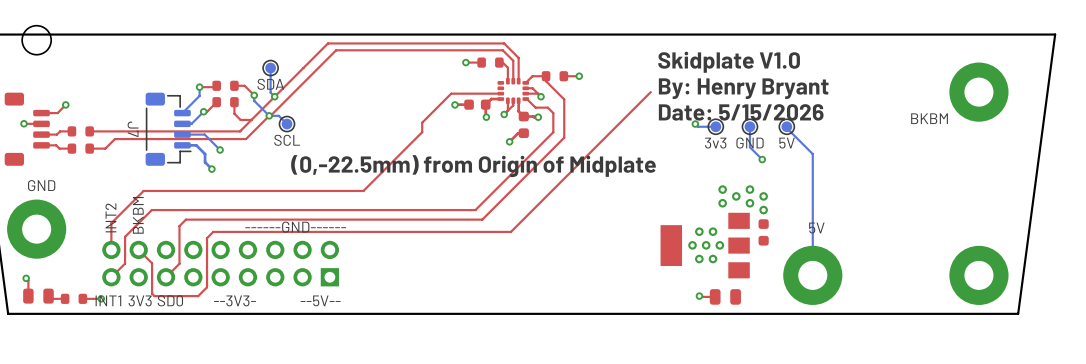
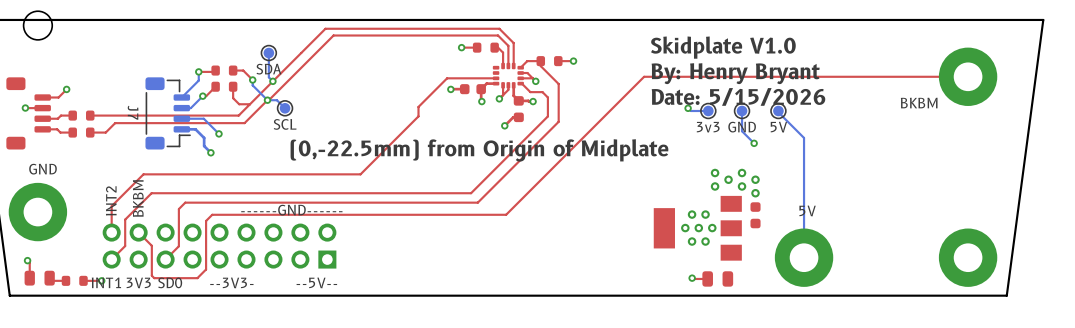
top track: none -> (968, 76) (644, 76)

